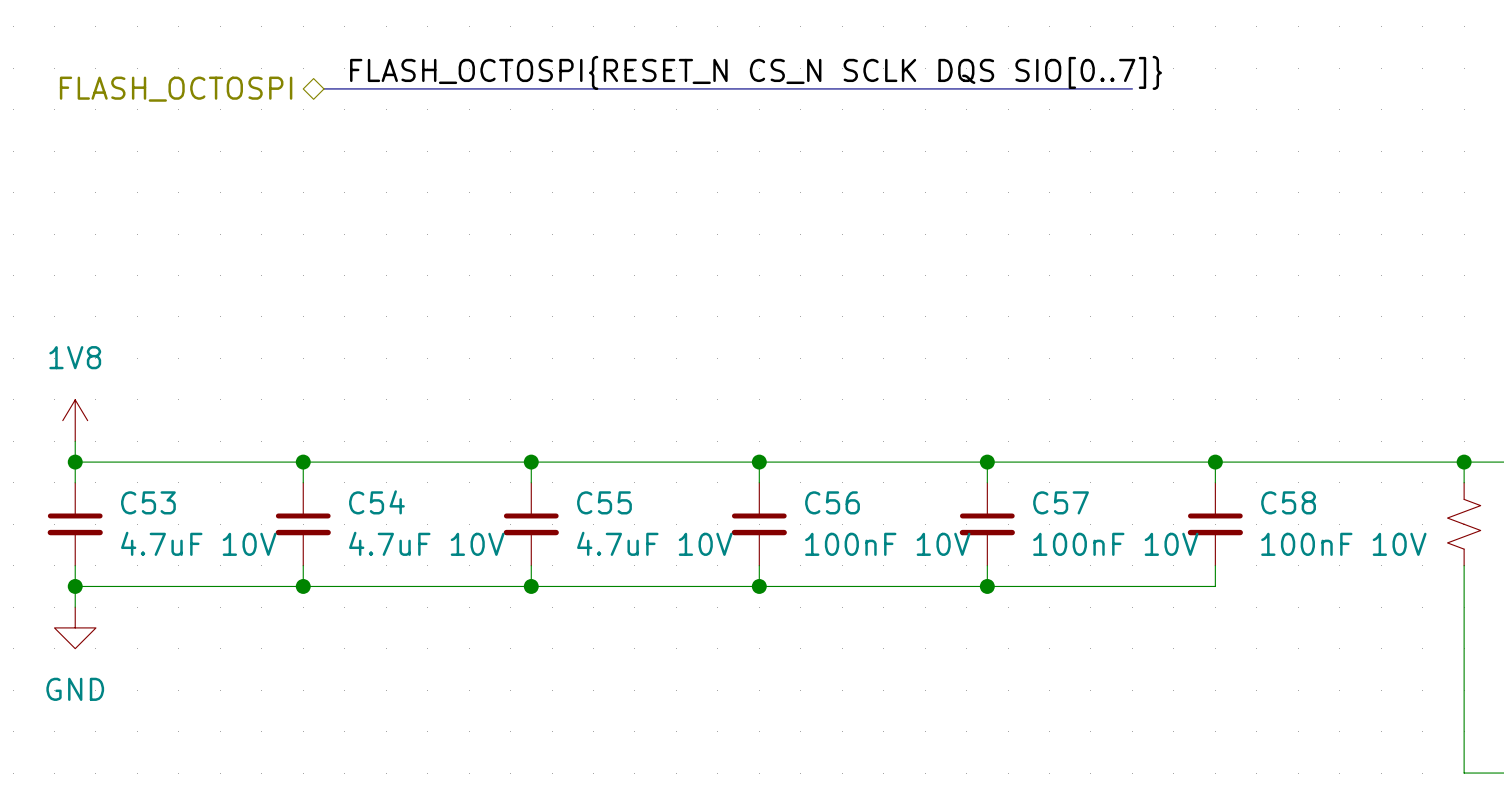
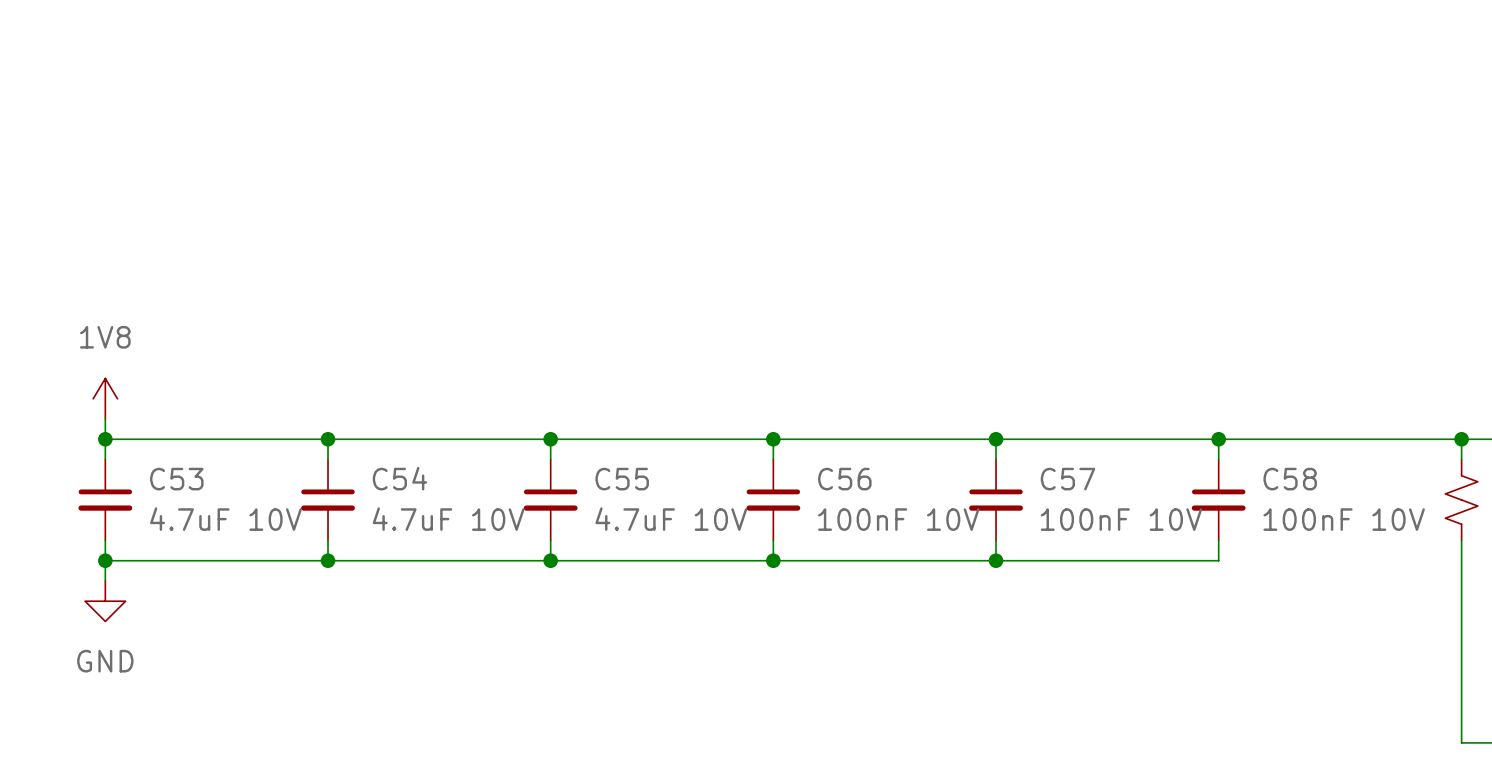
label: FLASH_OCTOSPI{RESET_N CS_N SCLK DQS SIO[0..7]} (756, 72) -> none
bus: (323, 88) (1132, 88) -> none
hierarchical label: FLASH_OCTOSPI (176, 89) -> none

